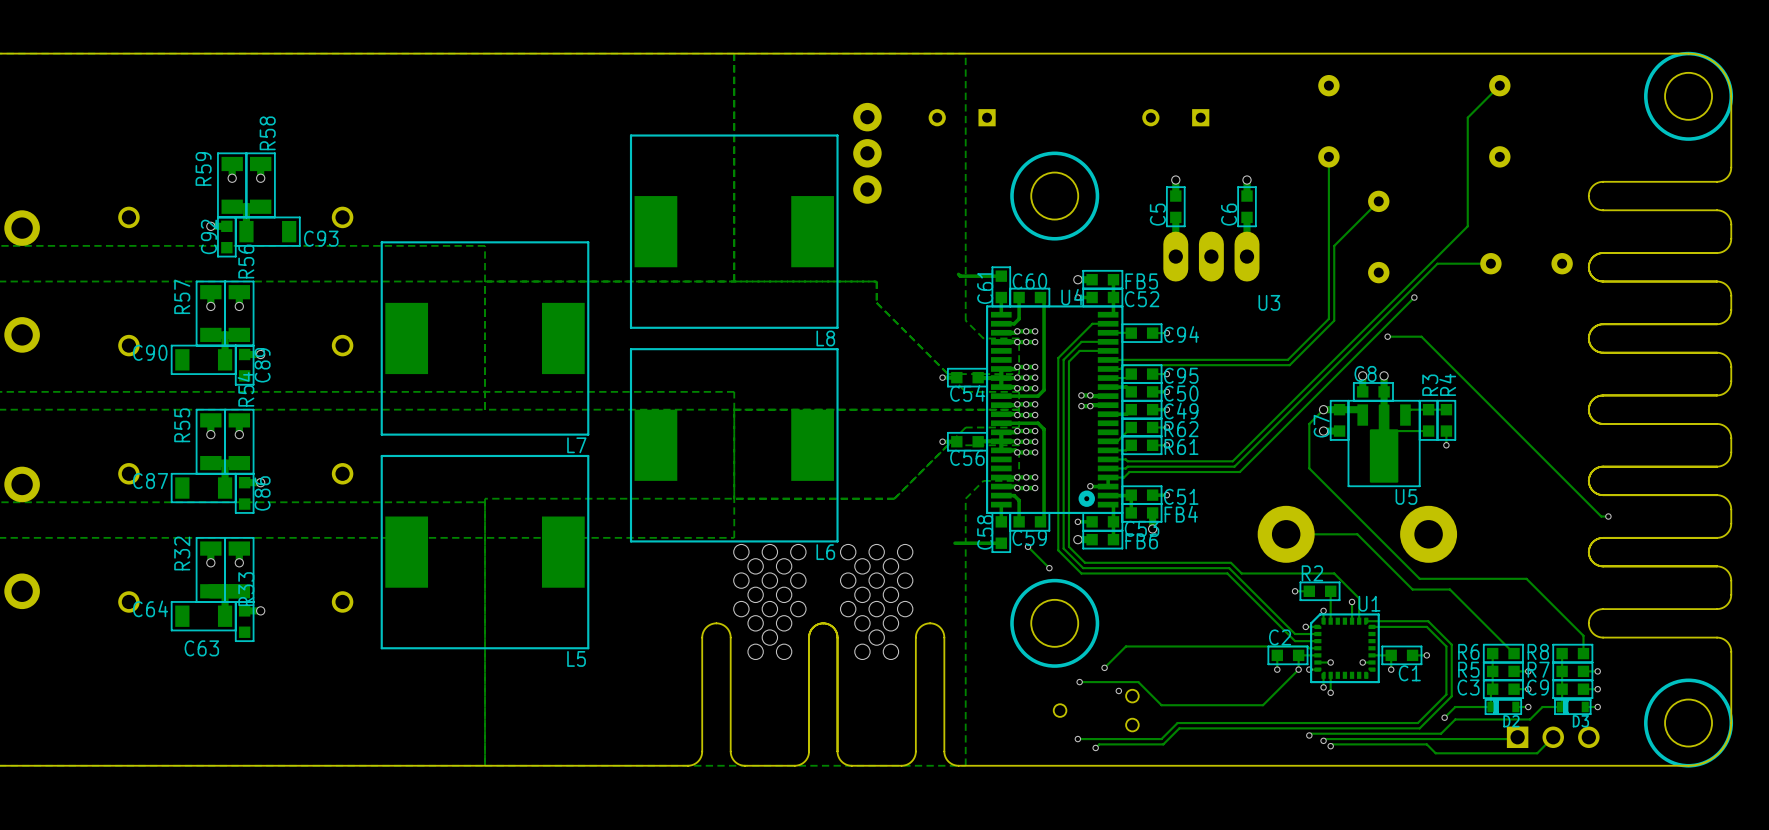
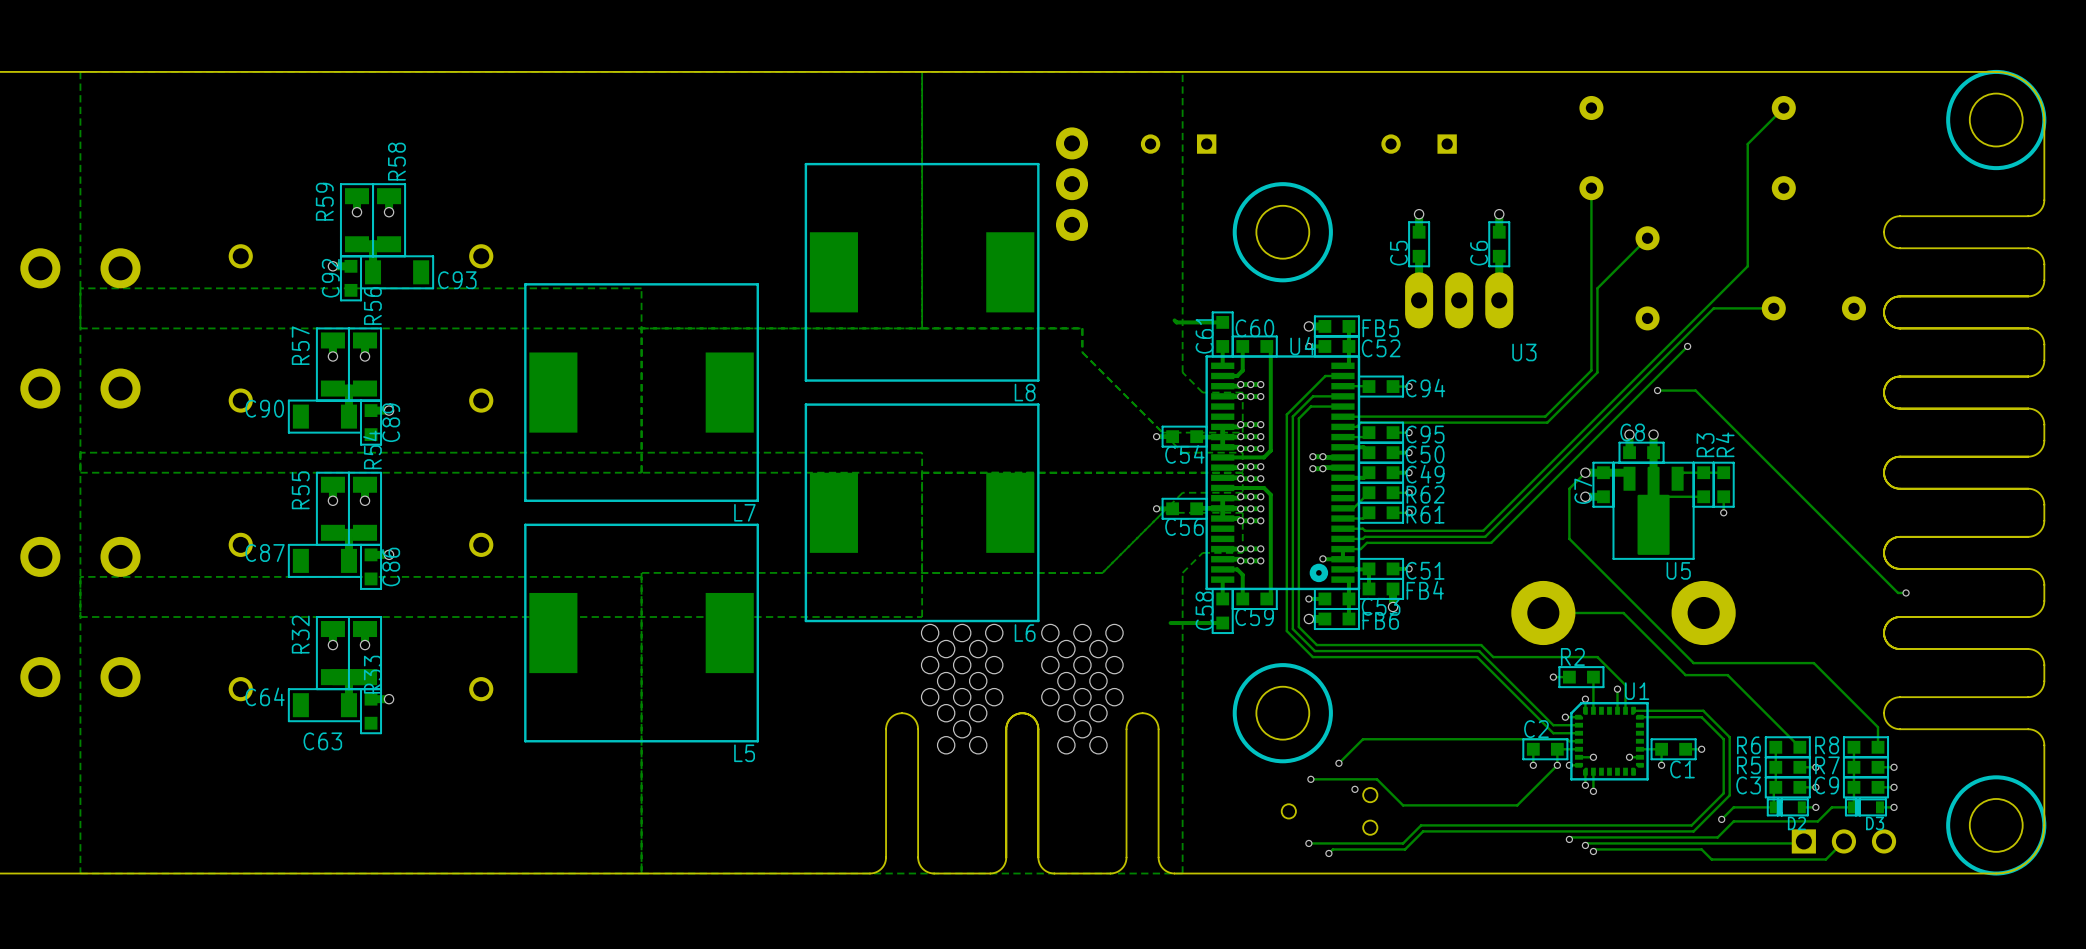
track: (1028, 546) (1049, 568) -> none
via: (1028, 546) -> none
via: (1049, 568) -> none

